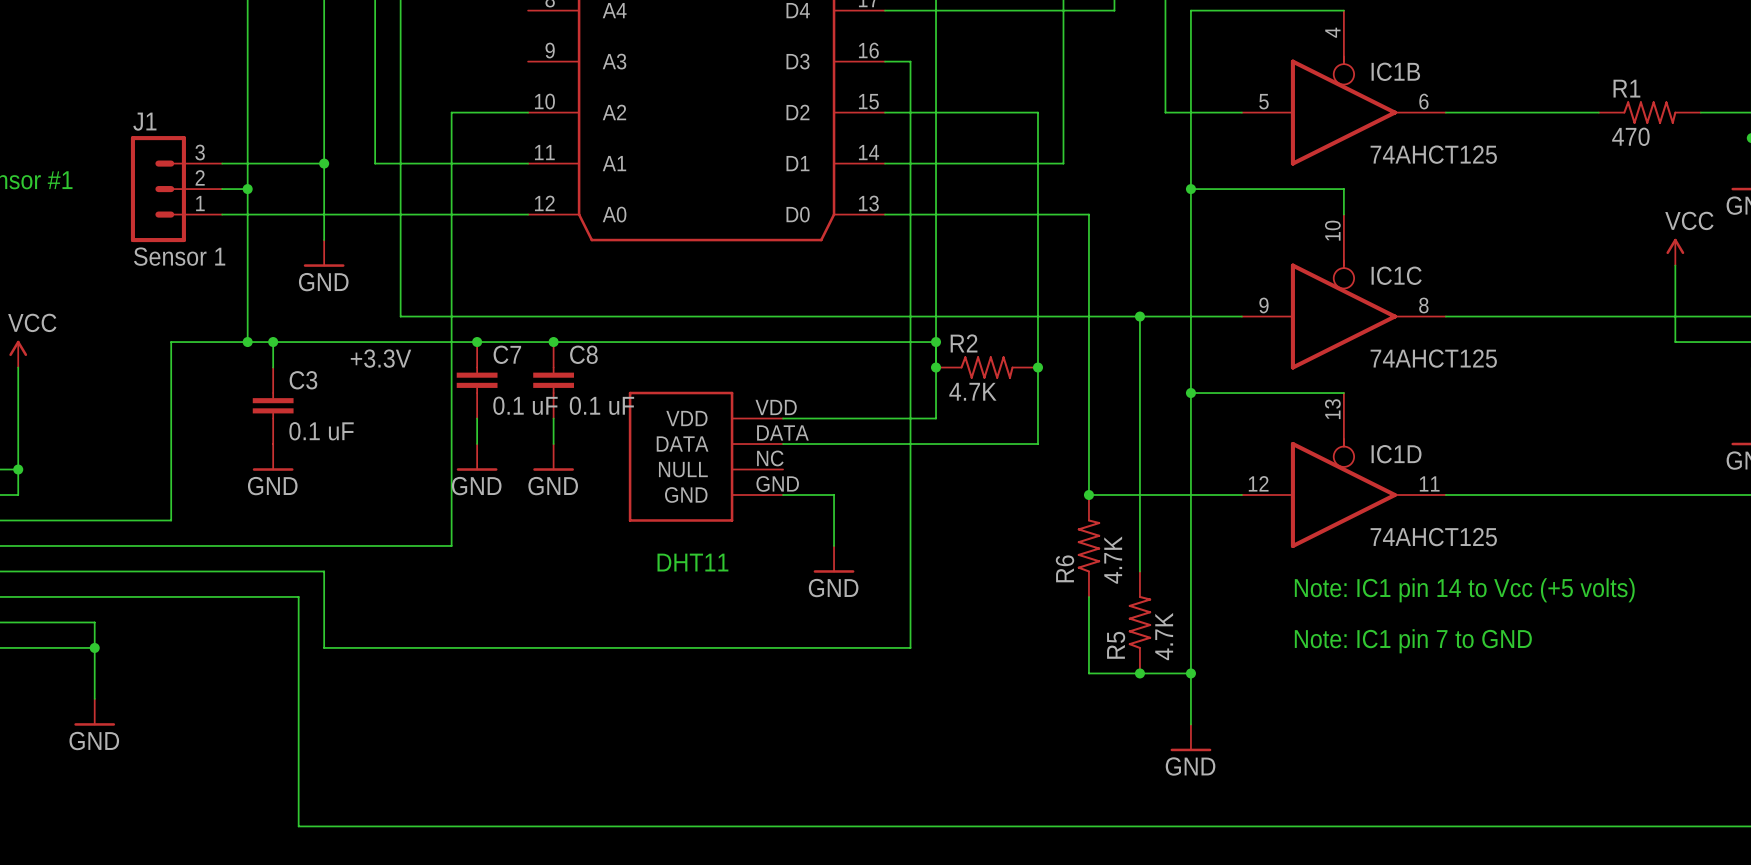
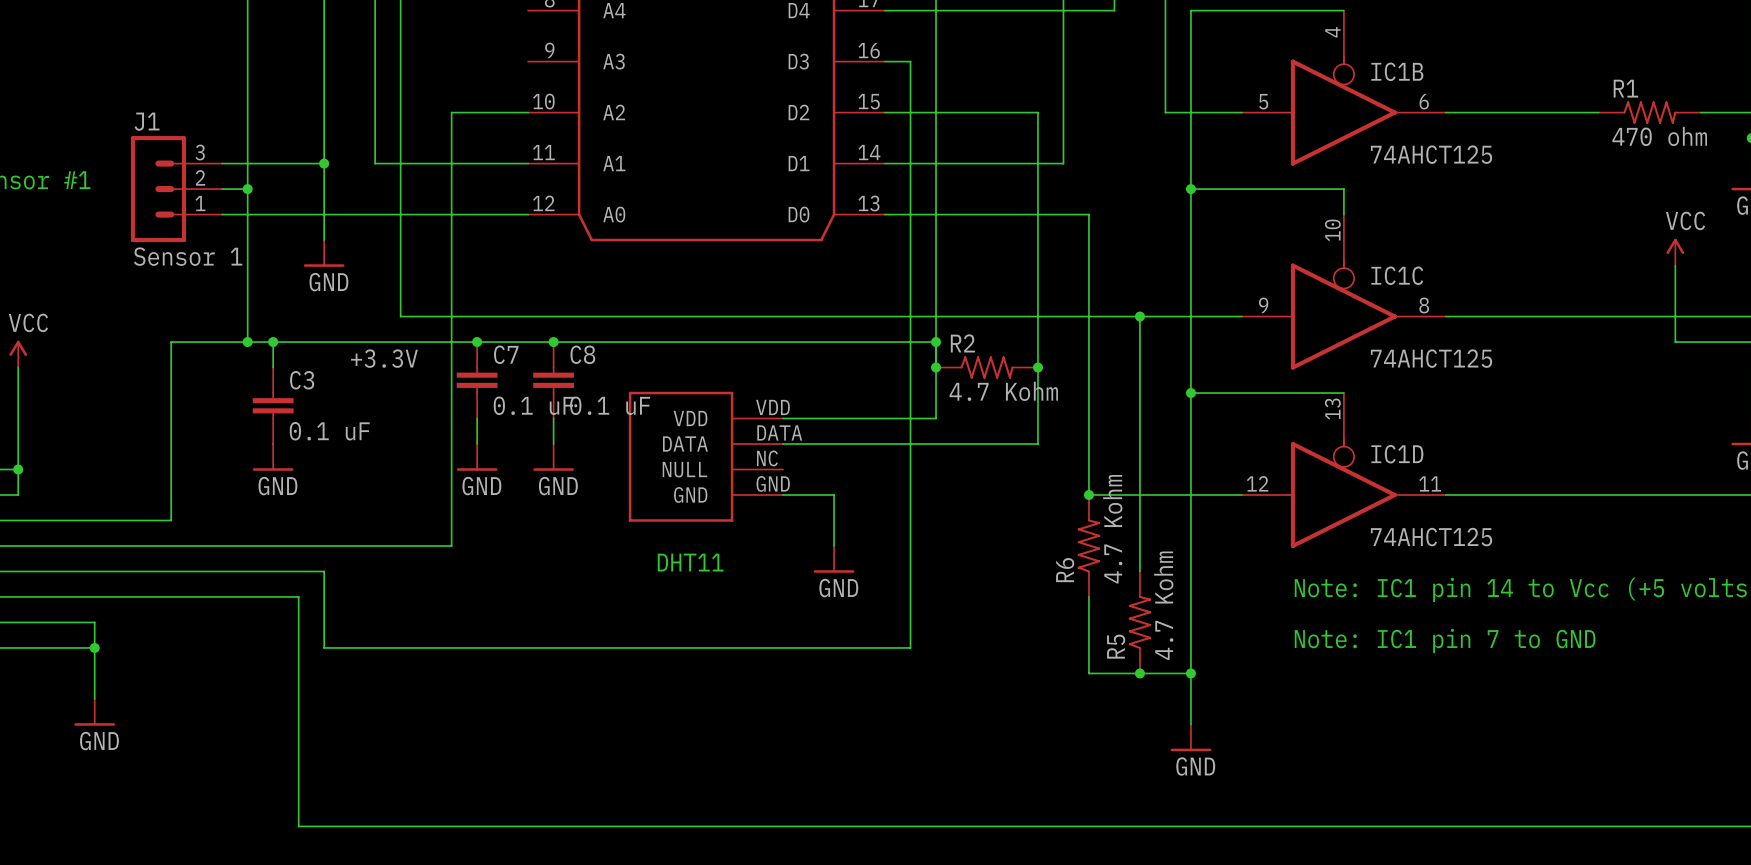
R1 value: 470 (1630, 136) -> 470 ohm (1659, 136)
R2 value: 4.7K (972, 391) -> 4.7 Kohm (1003, 391)
R6 value: 4.7K (1113, 560) -> 4.7 Kohm (1112, 529)
R5 value: 4.7K (1164, 636) -> 4.7 Kohm (1163, 605)

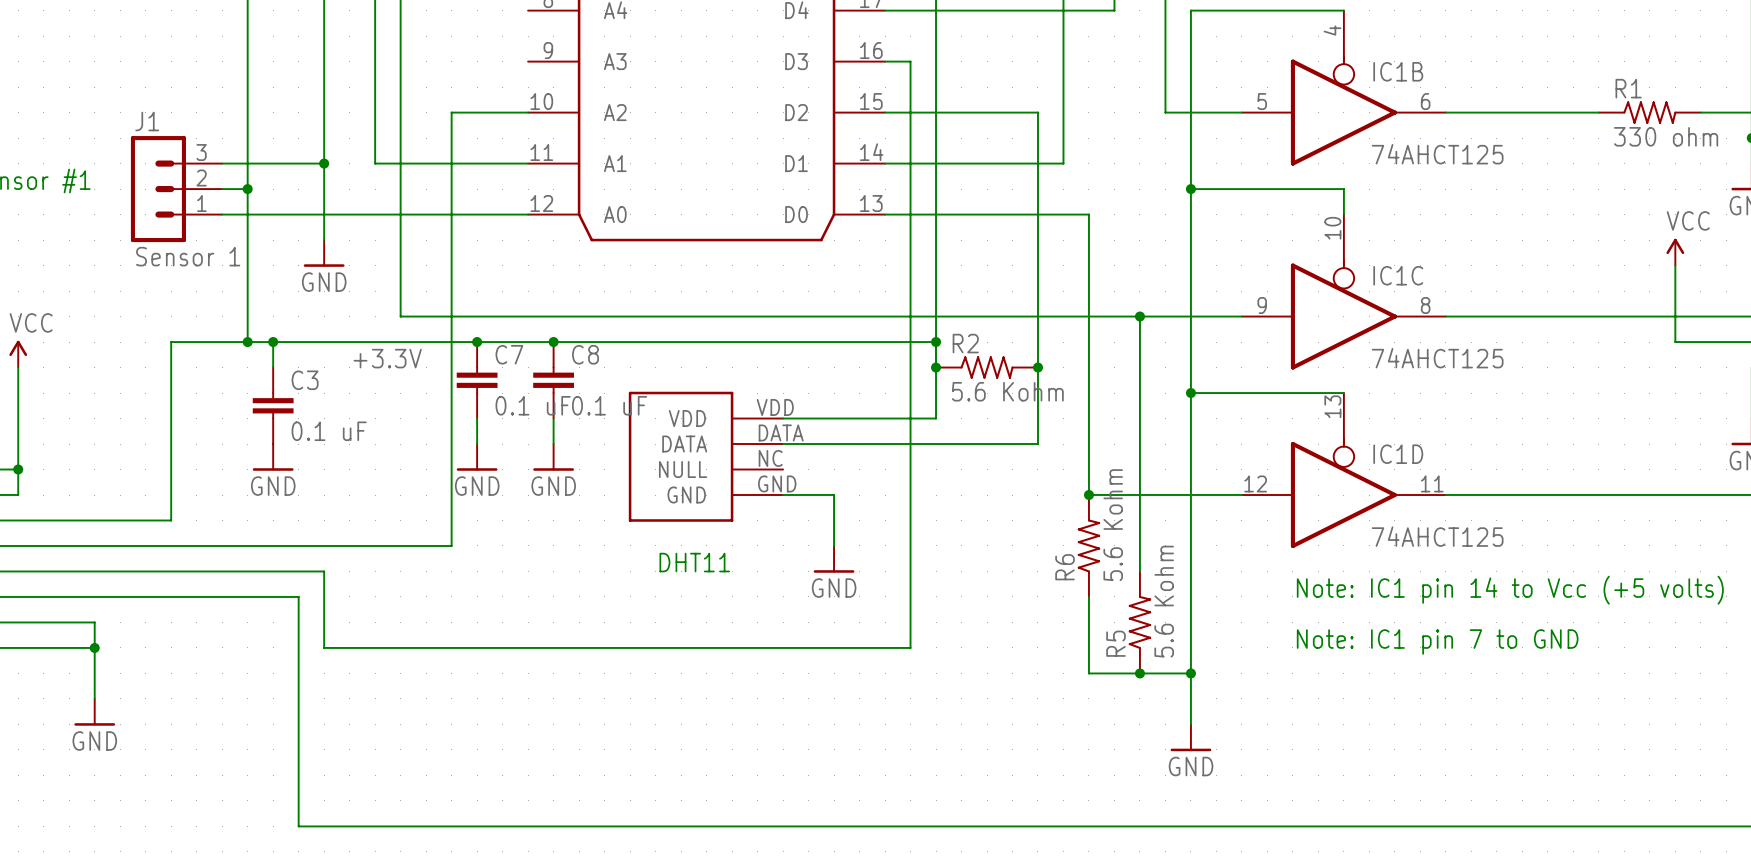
R1 value: 470 ohm (1659, 136) -> 330 ohm (1666, 136)
R2 value: 4.7 Kohm (1003, 391) -> 5.6 Kohm (1007, 391)
R6 value: 4.7 Kohm (1112, 529) -> 5.6 Kohm (1113, 525)
R5 value: 4.7 Kohm (1163, 605) -> 5.6 Kohm (1164, 601)

